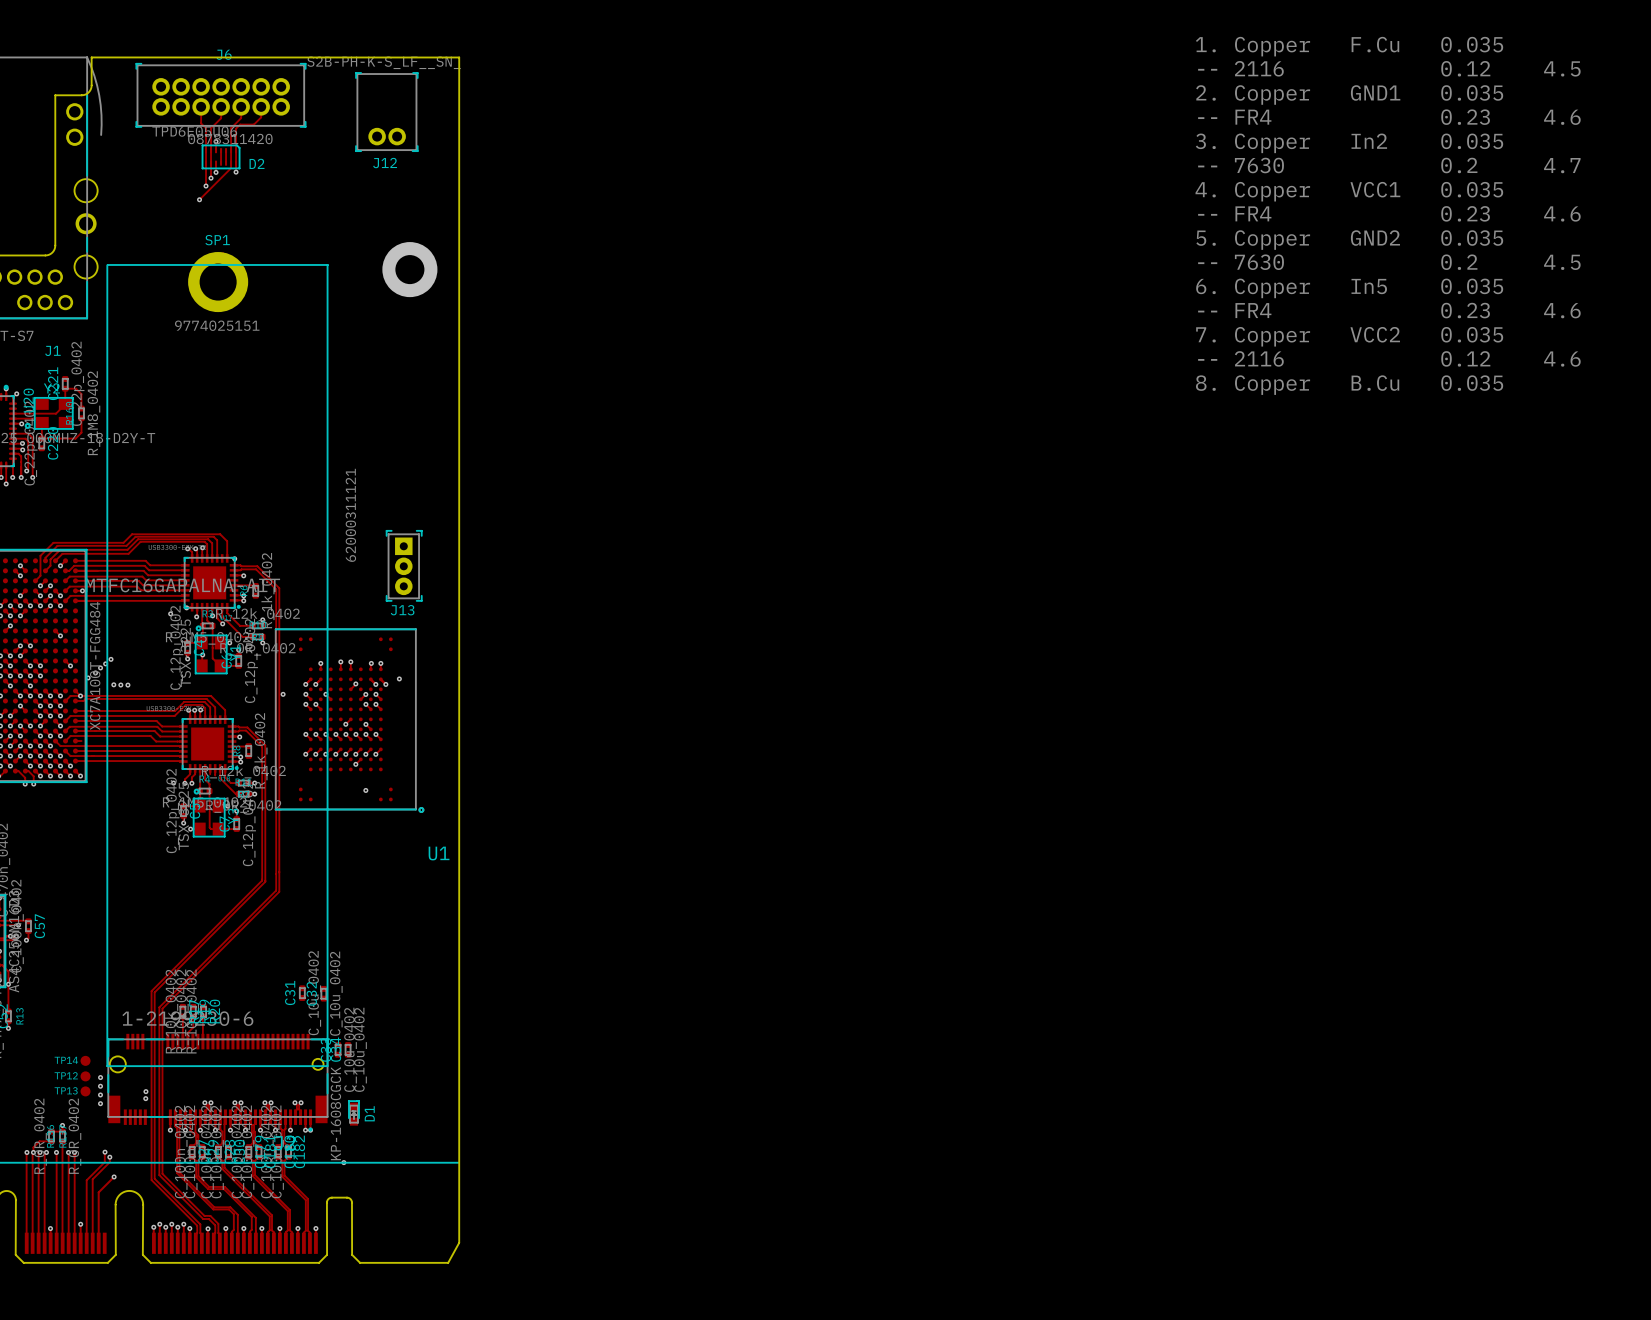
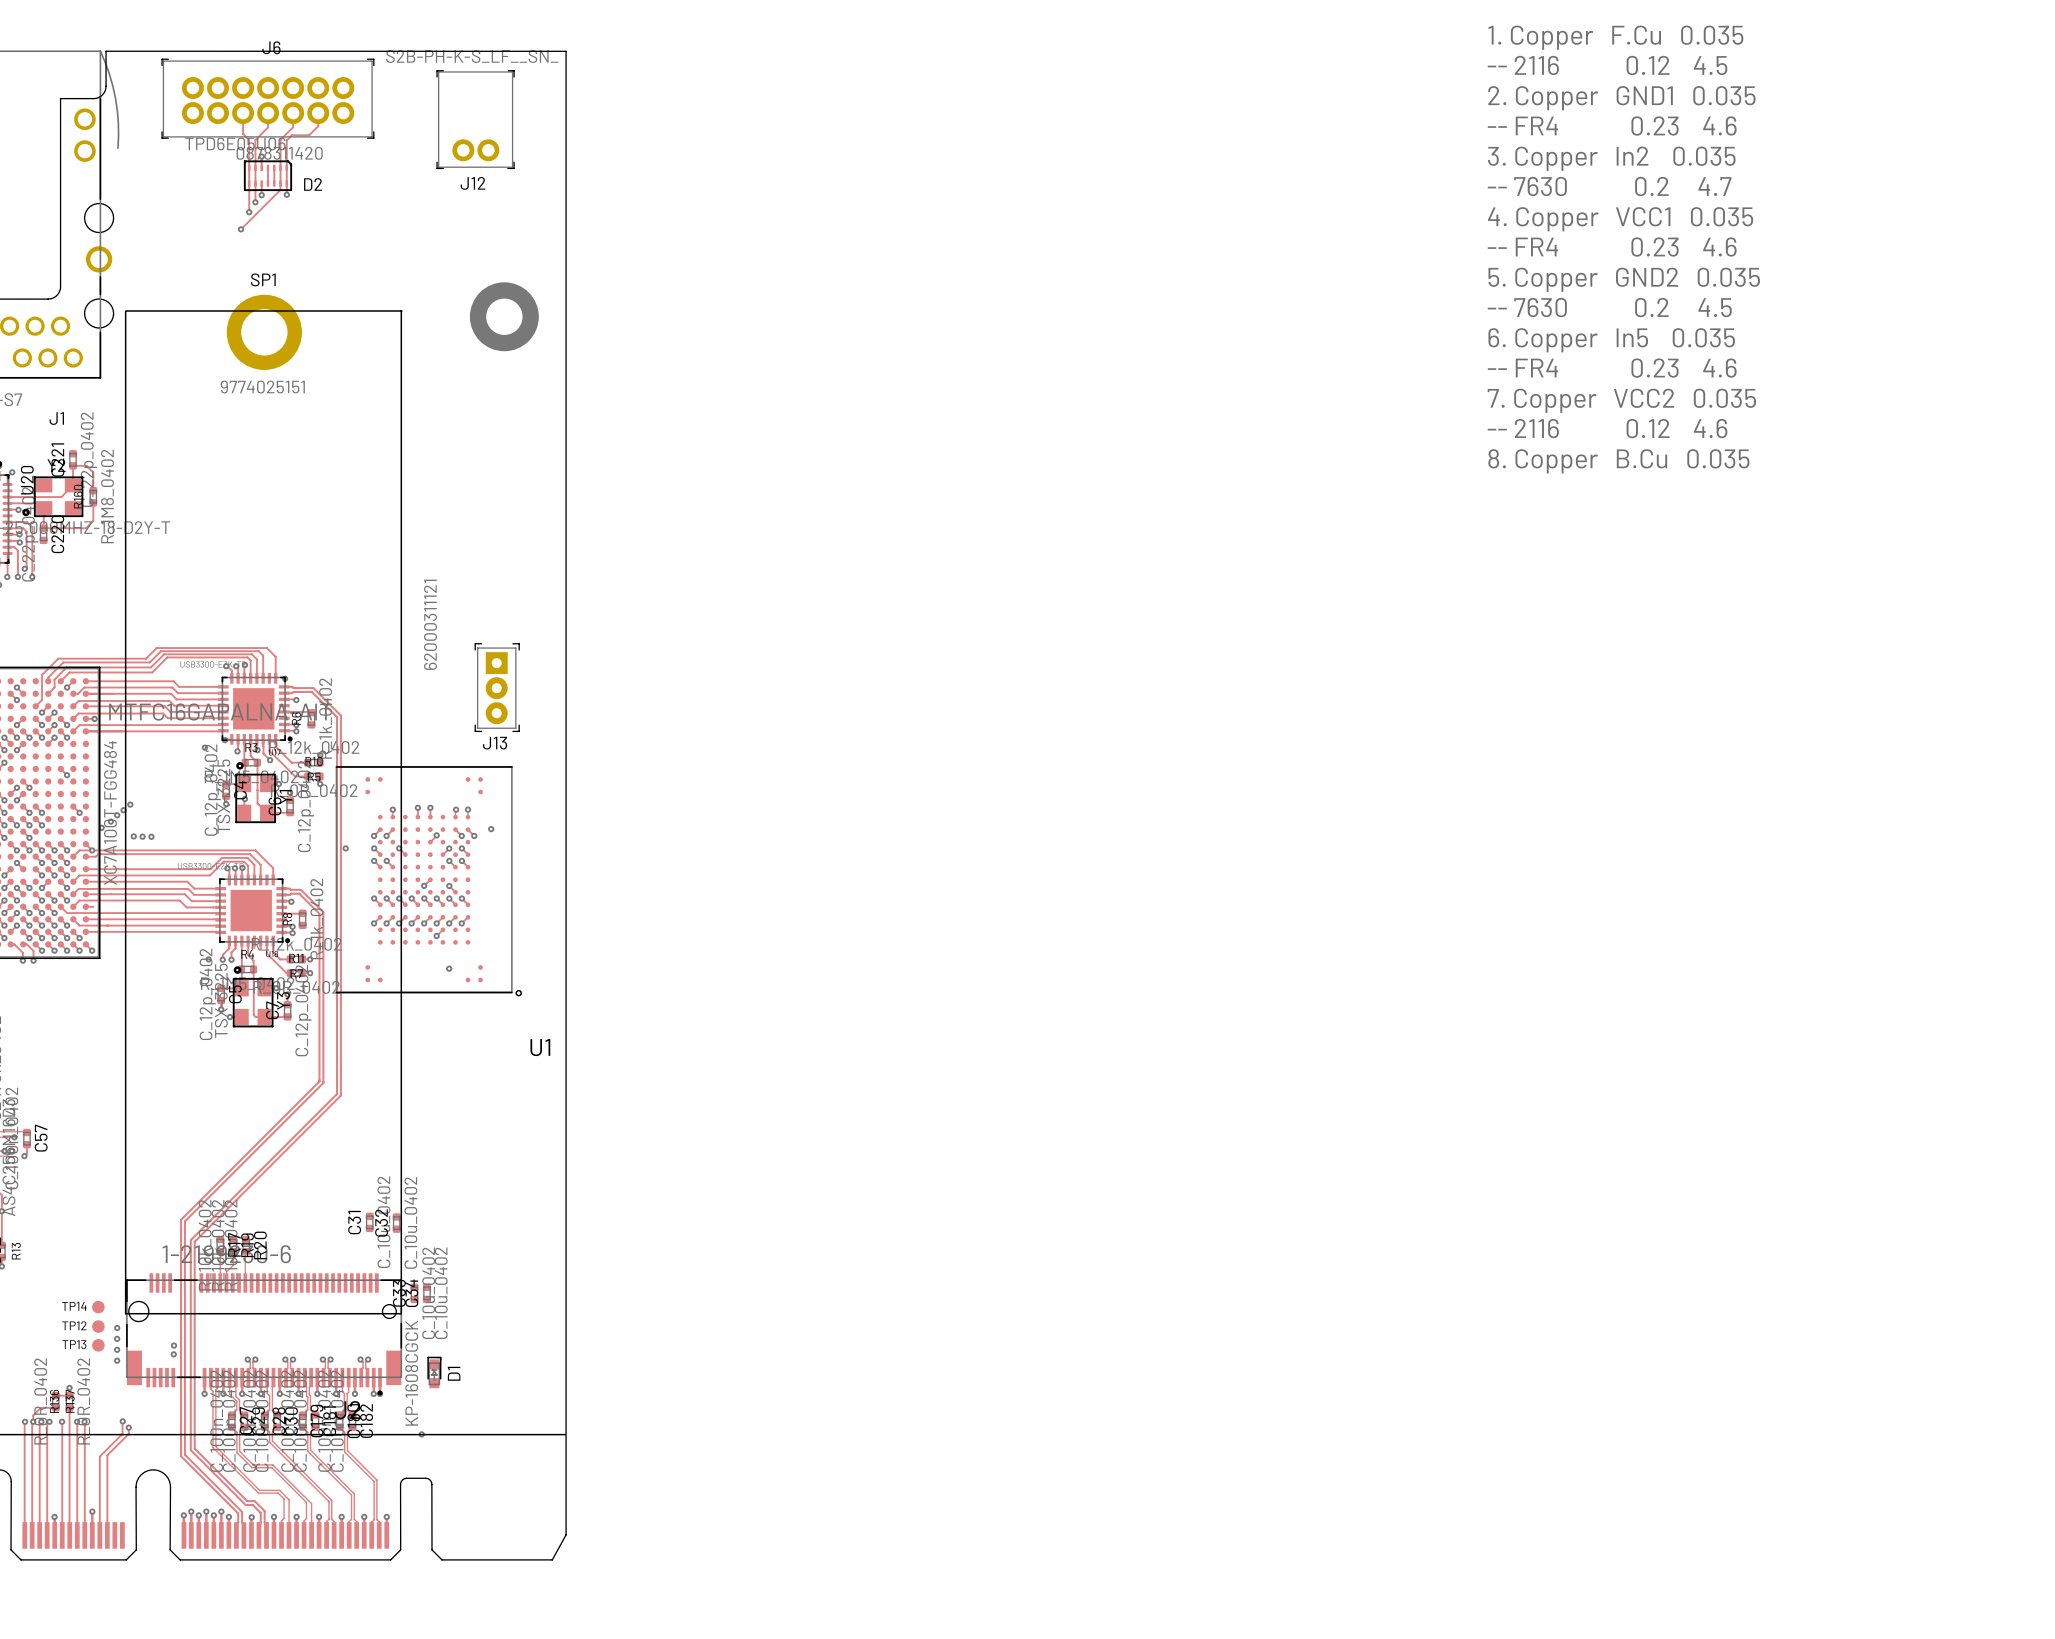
track: (114, 1176) (98, 1192) (98, 1243) -> none
via: (114, 1176) -> none

